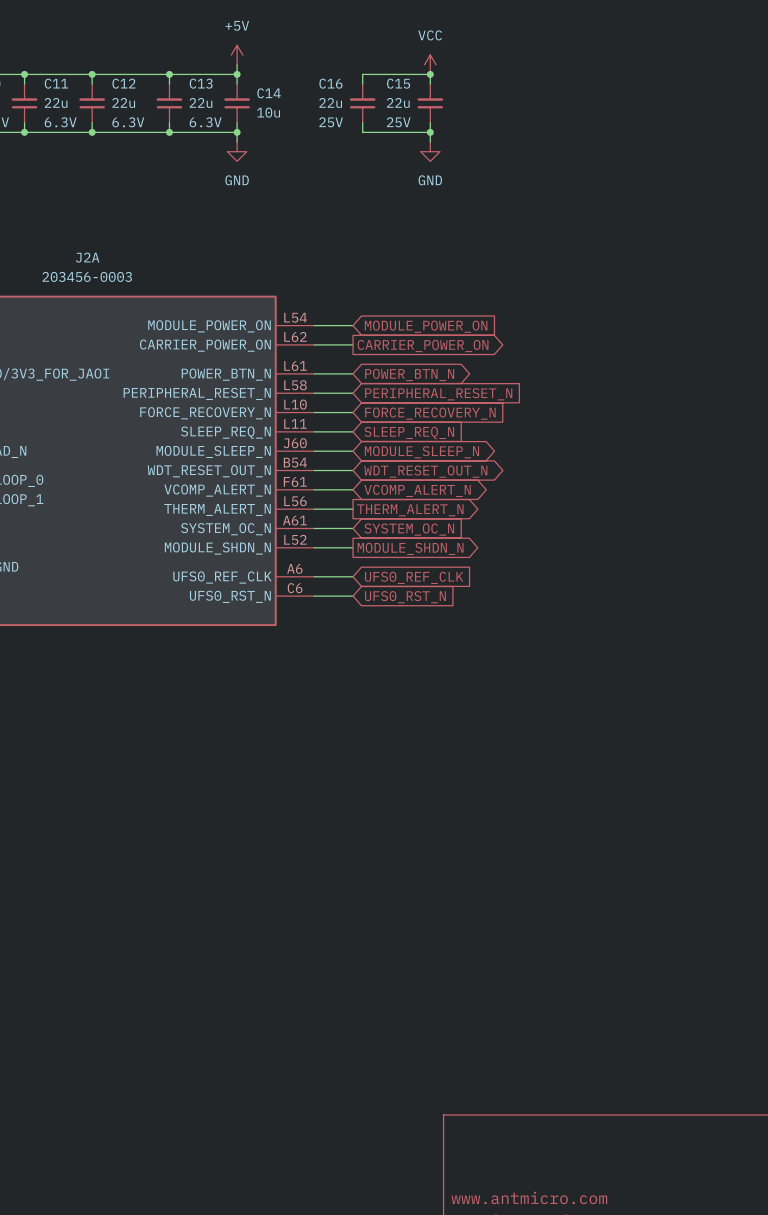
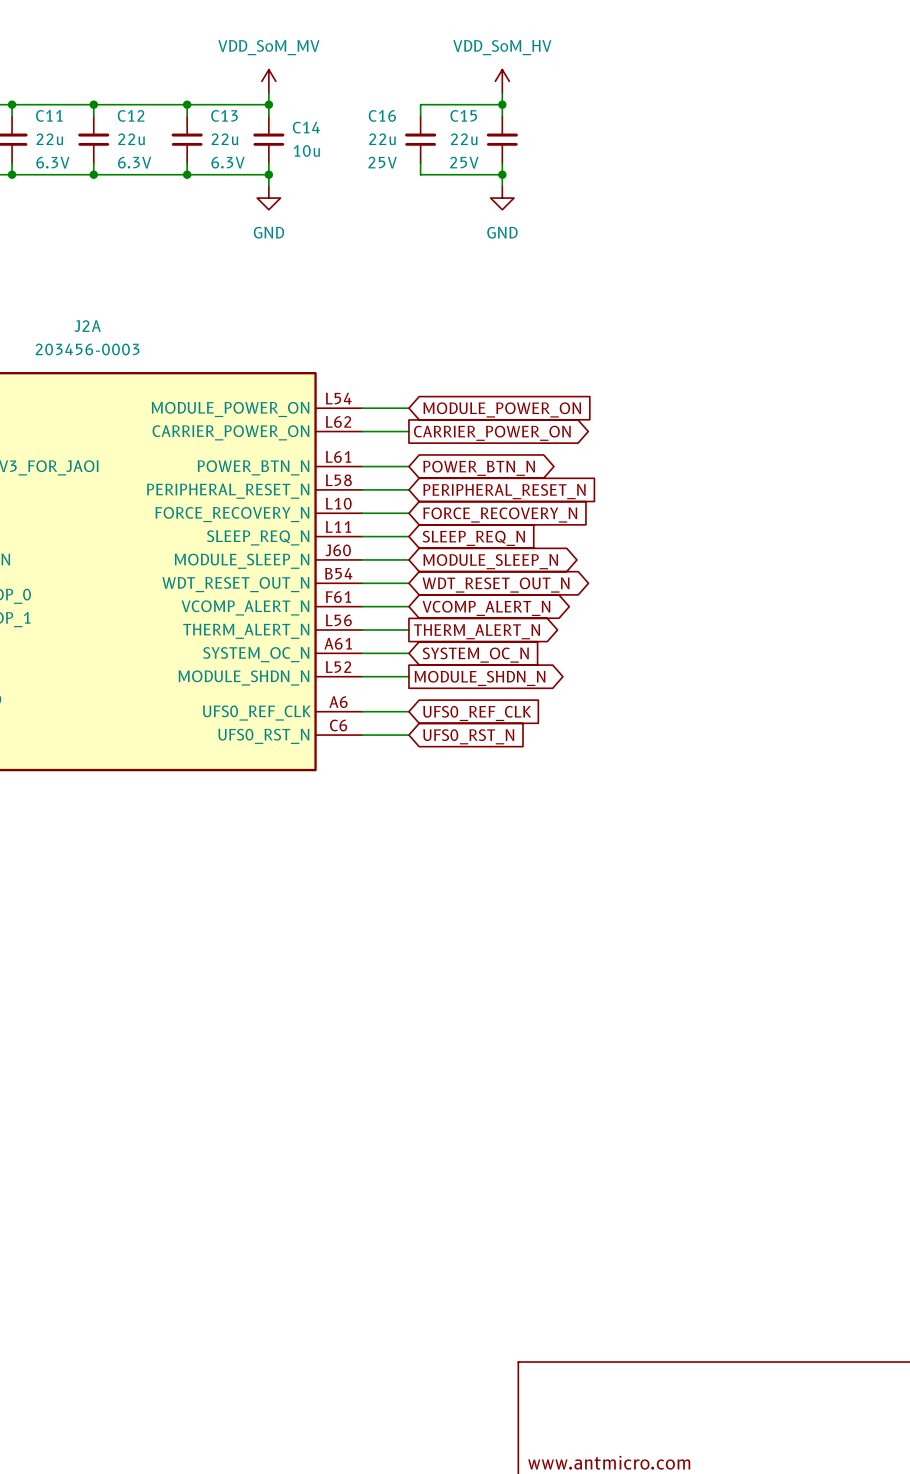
power symbol: +5V (237, 55) -> VDD_SoM_MV (268, 81)
power symbol: none -> VDD_SoM_HV (502, 81)
power symbol: VCC (430, 64) -> none

